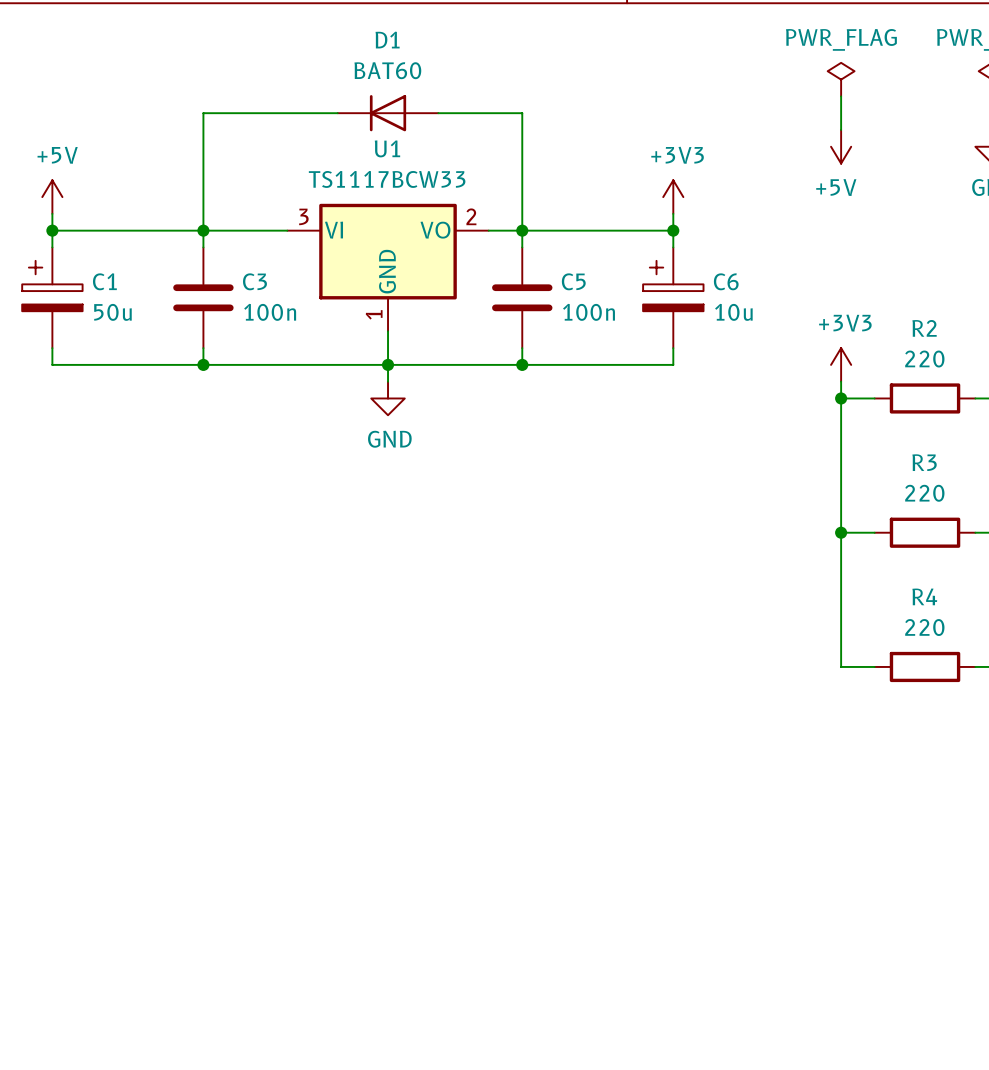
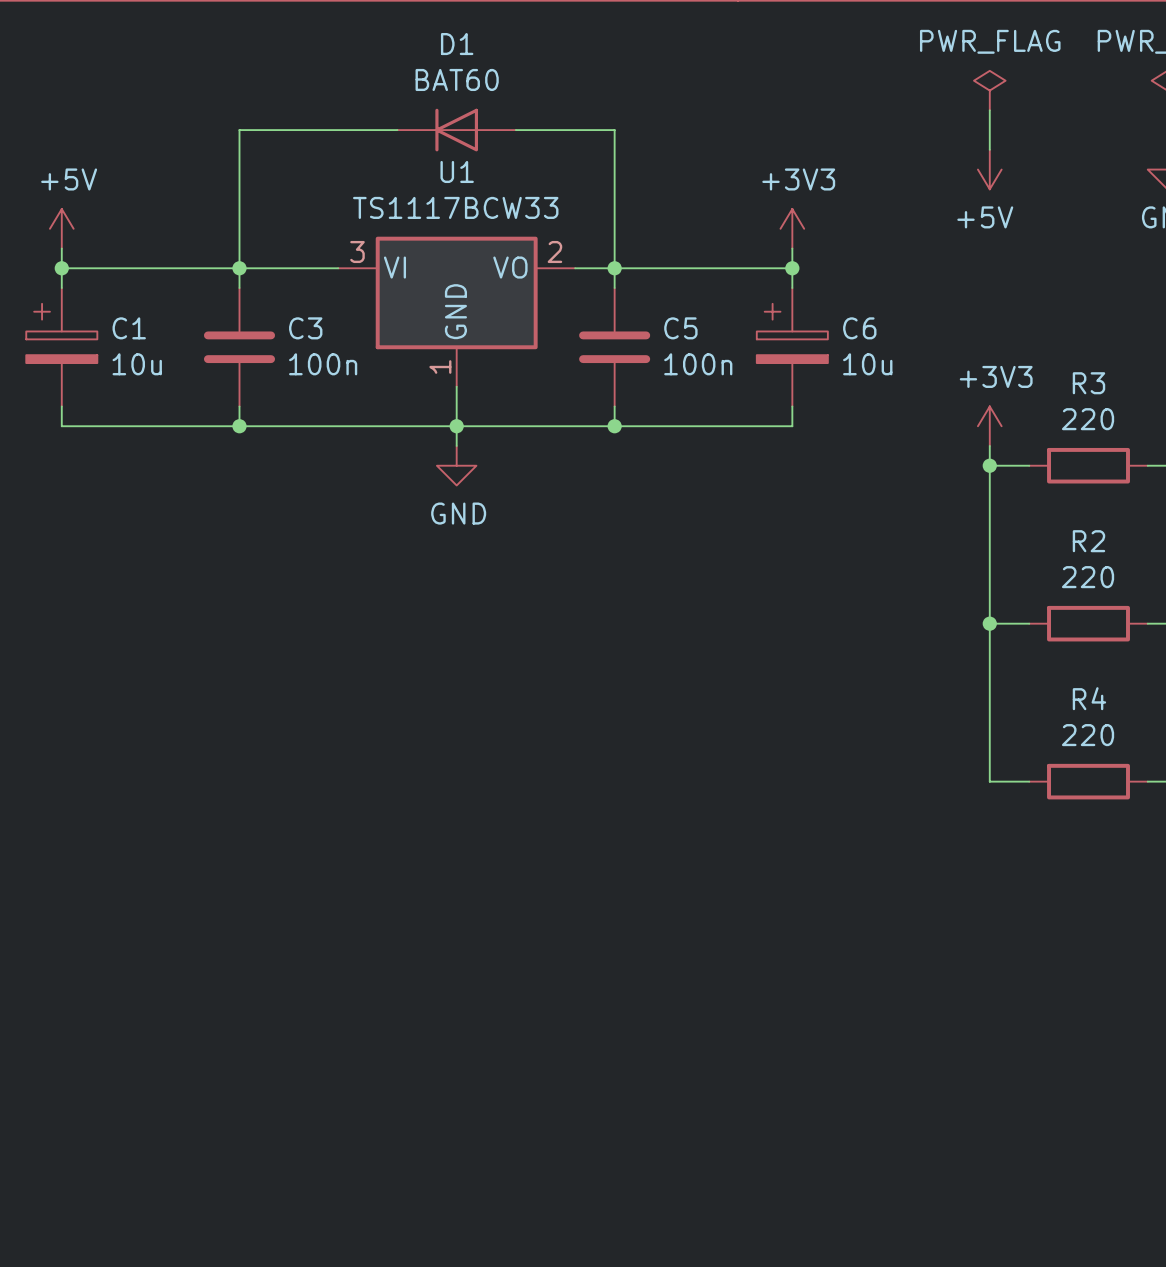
C1 value: 50u (112, 312) -> 10u (137, 364)
R2 name: R2 (924, 328) -> R3 (1088, 383)
R3 name: R3 (924, 462) -> R2 (1088, 541)

